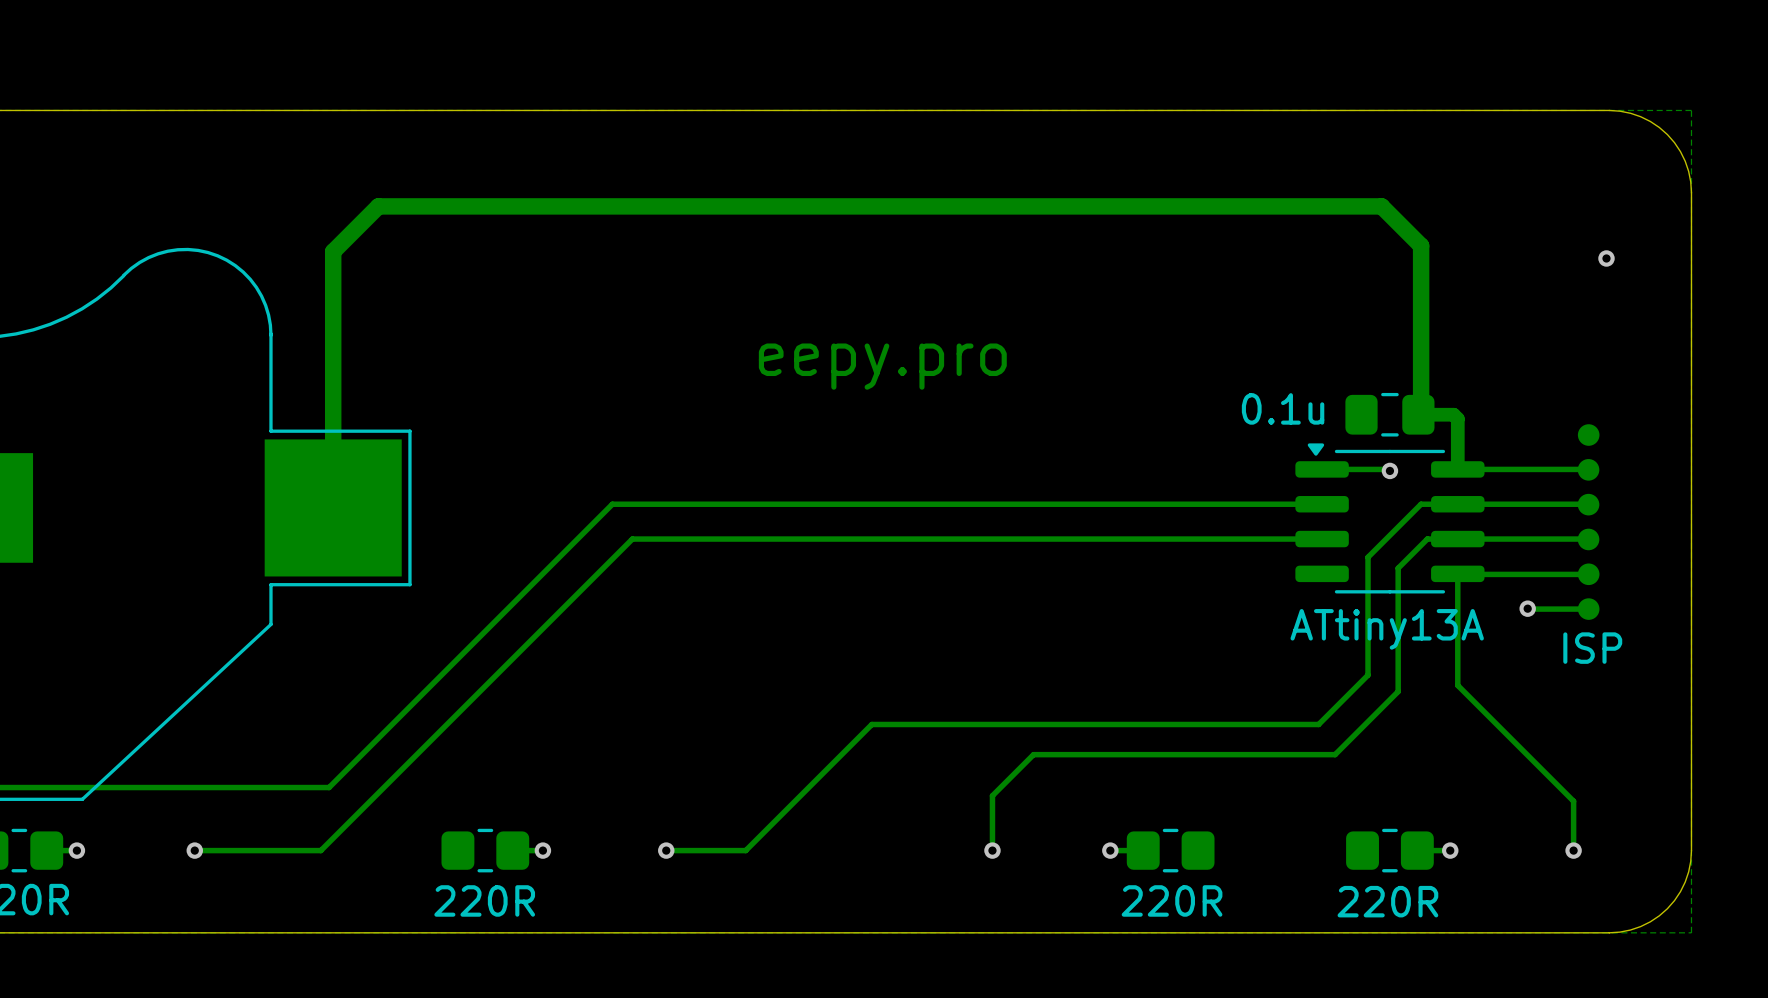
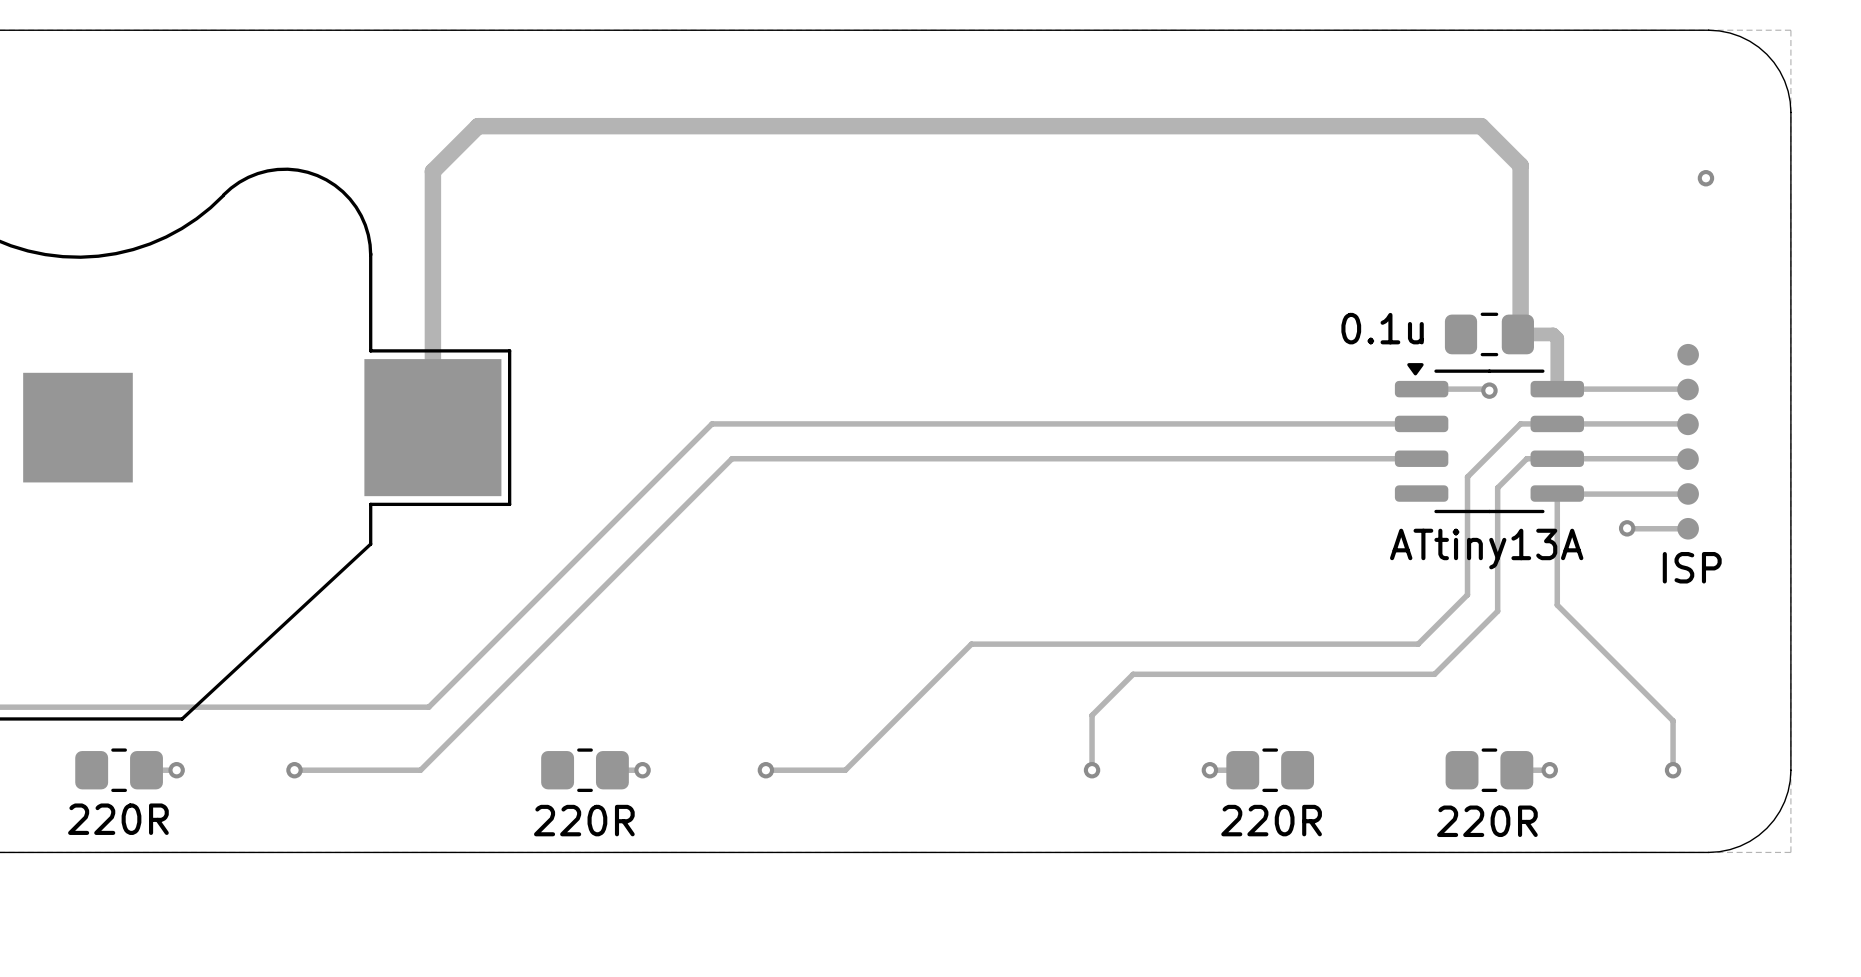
text: eepy.pro (882, 366) -> none

